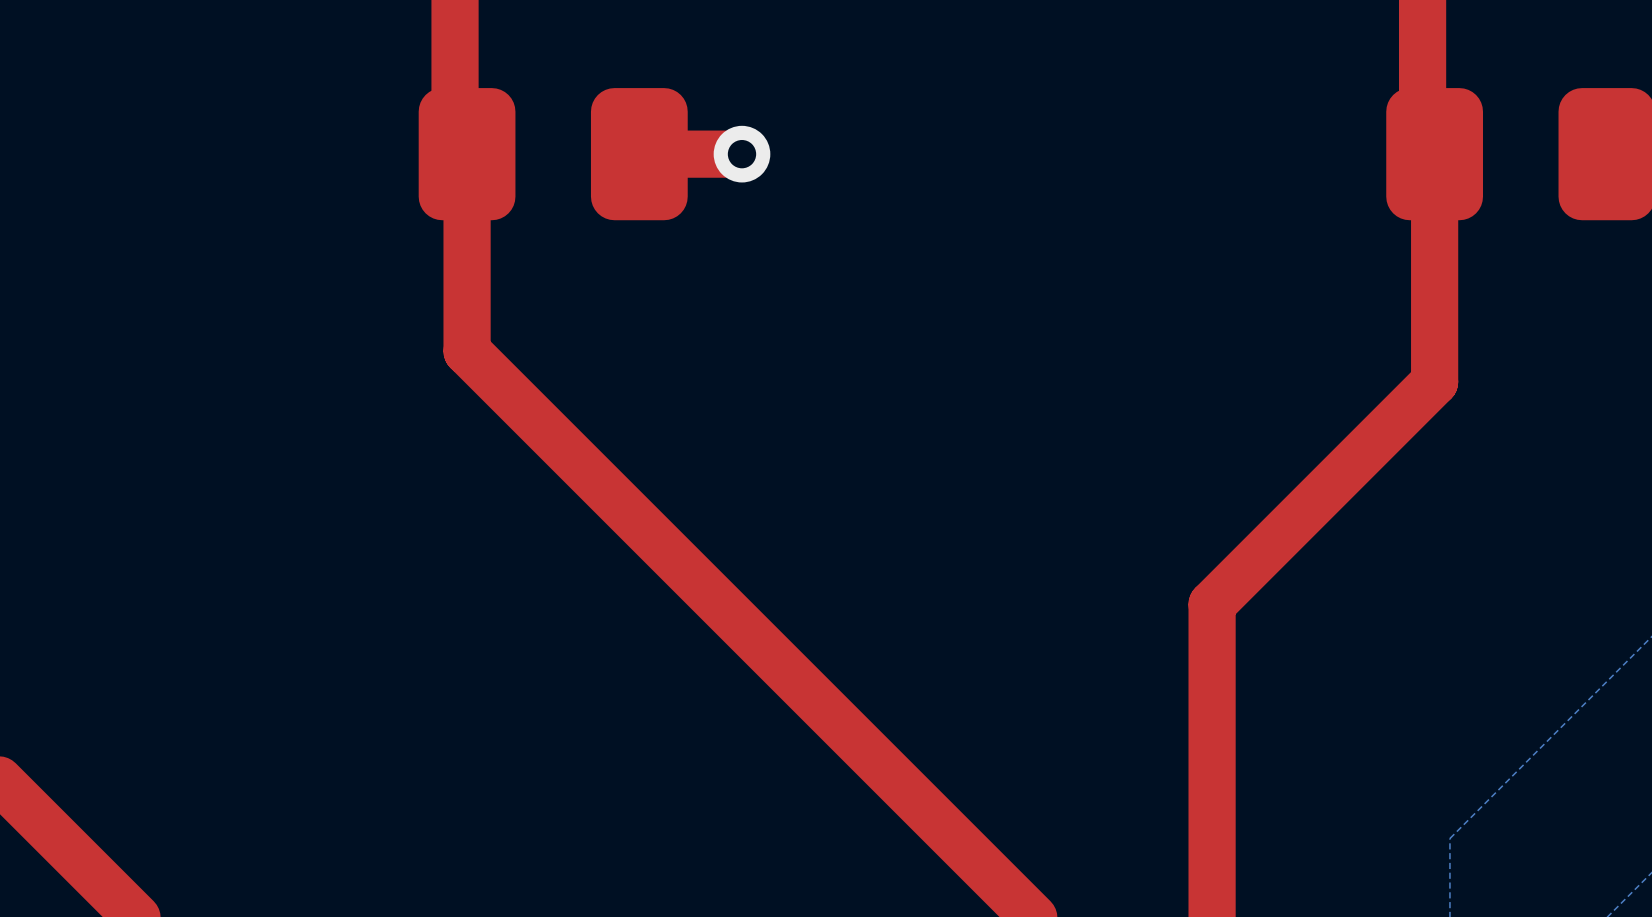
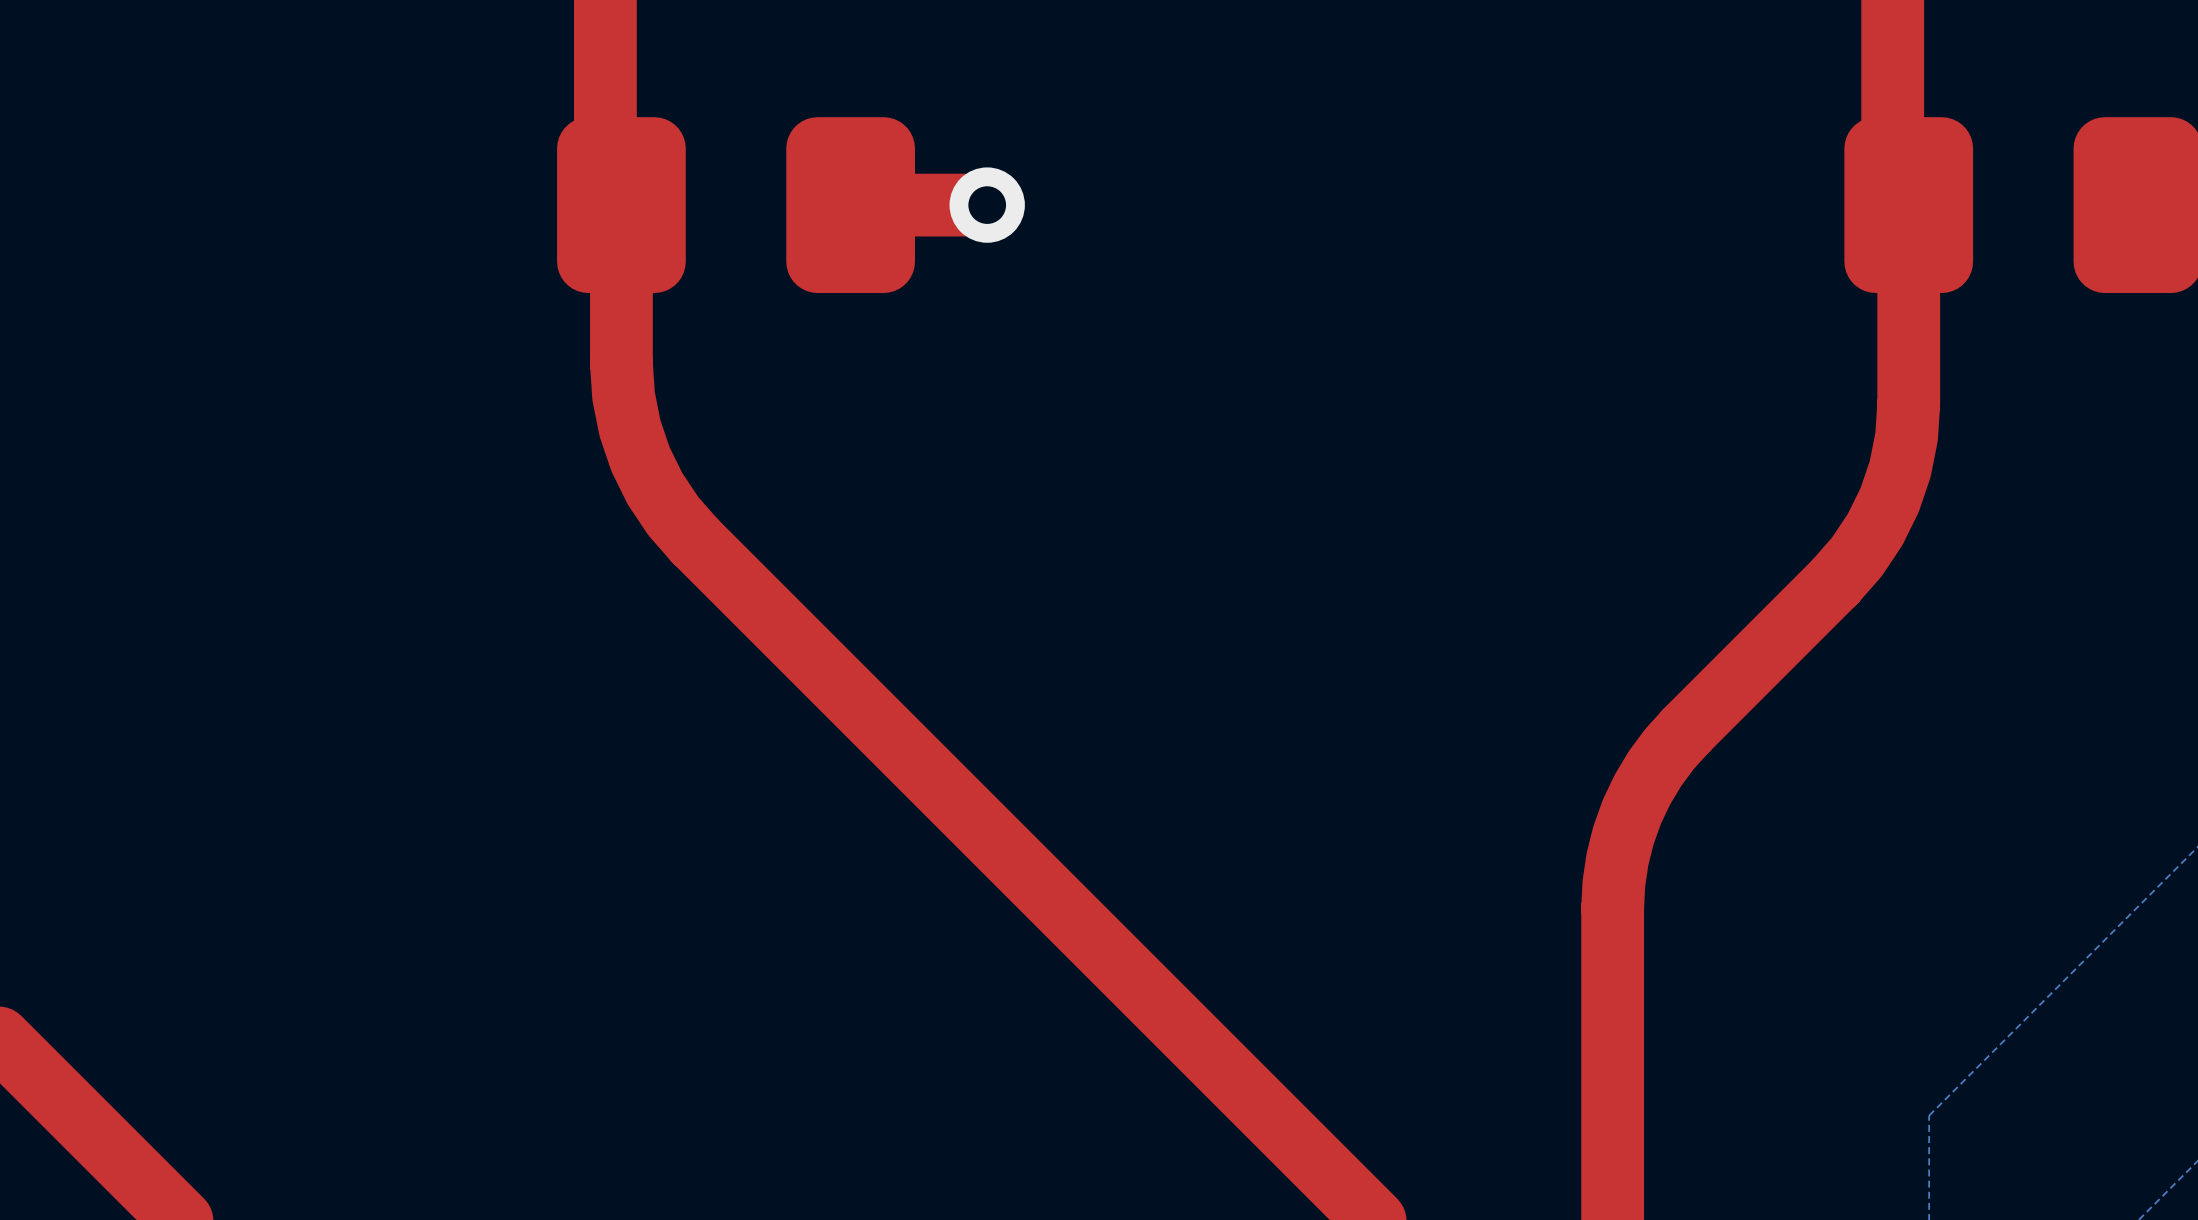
top track: (467, 273) (467, 351) (522, 406) -> (621, 363) (623, 396) (629, 428) (640, 459) (655, 488) (673, 516) (694, 540)
top track: (1434, 303) (1434, 381) (1379, 437) -> (1908, 404) (1906, 436) (1900, 469) (1889, 500) (1875, 529) (1856, 556) (1835, 581)
top track: (1267, 549) (1212, 604) (1212, 682) -> (1686, 730) (1654, 768) (1631, 812) (1617, 859) (1612, 908)

